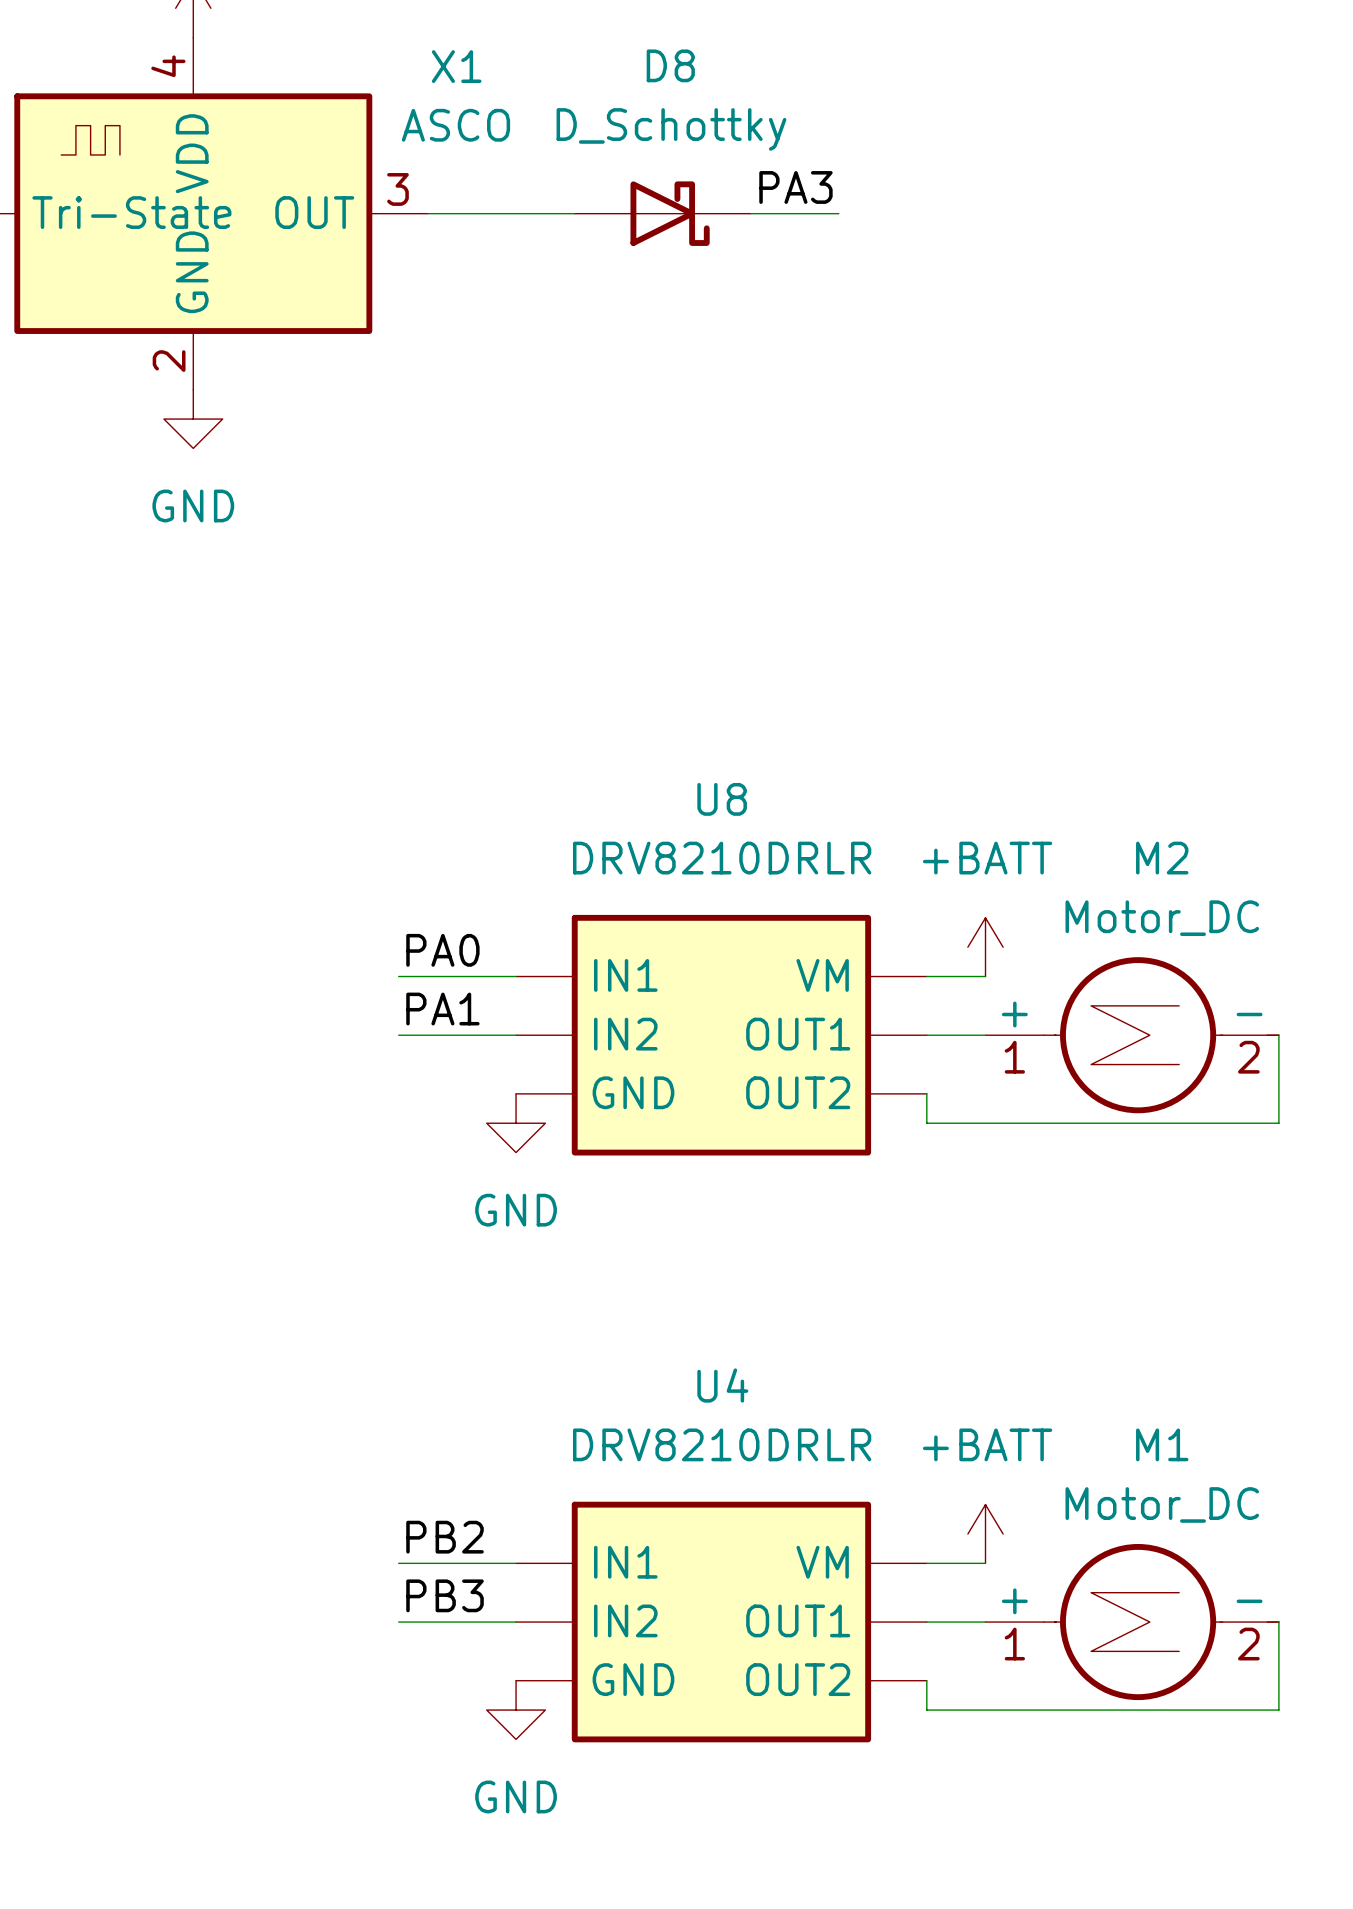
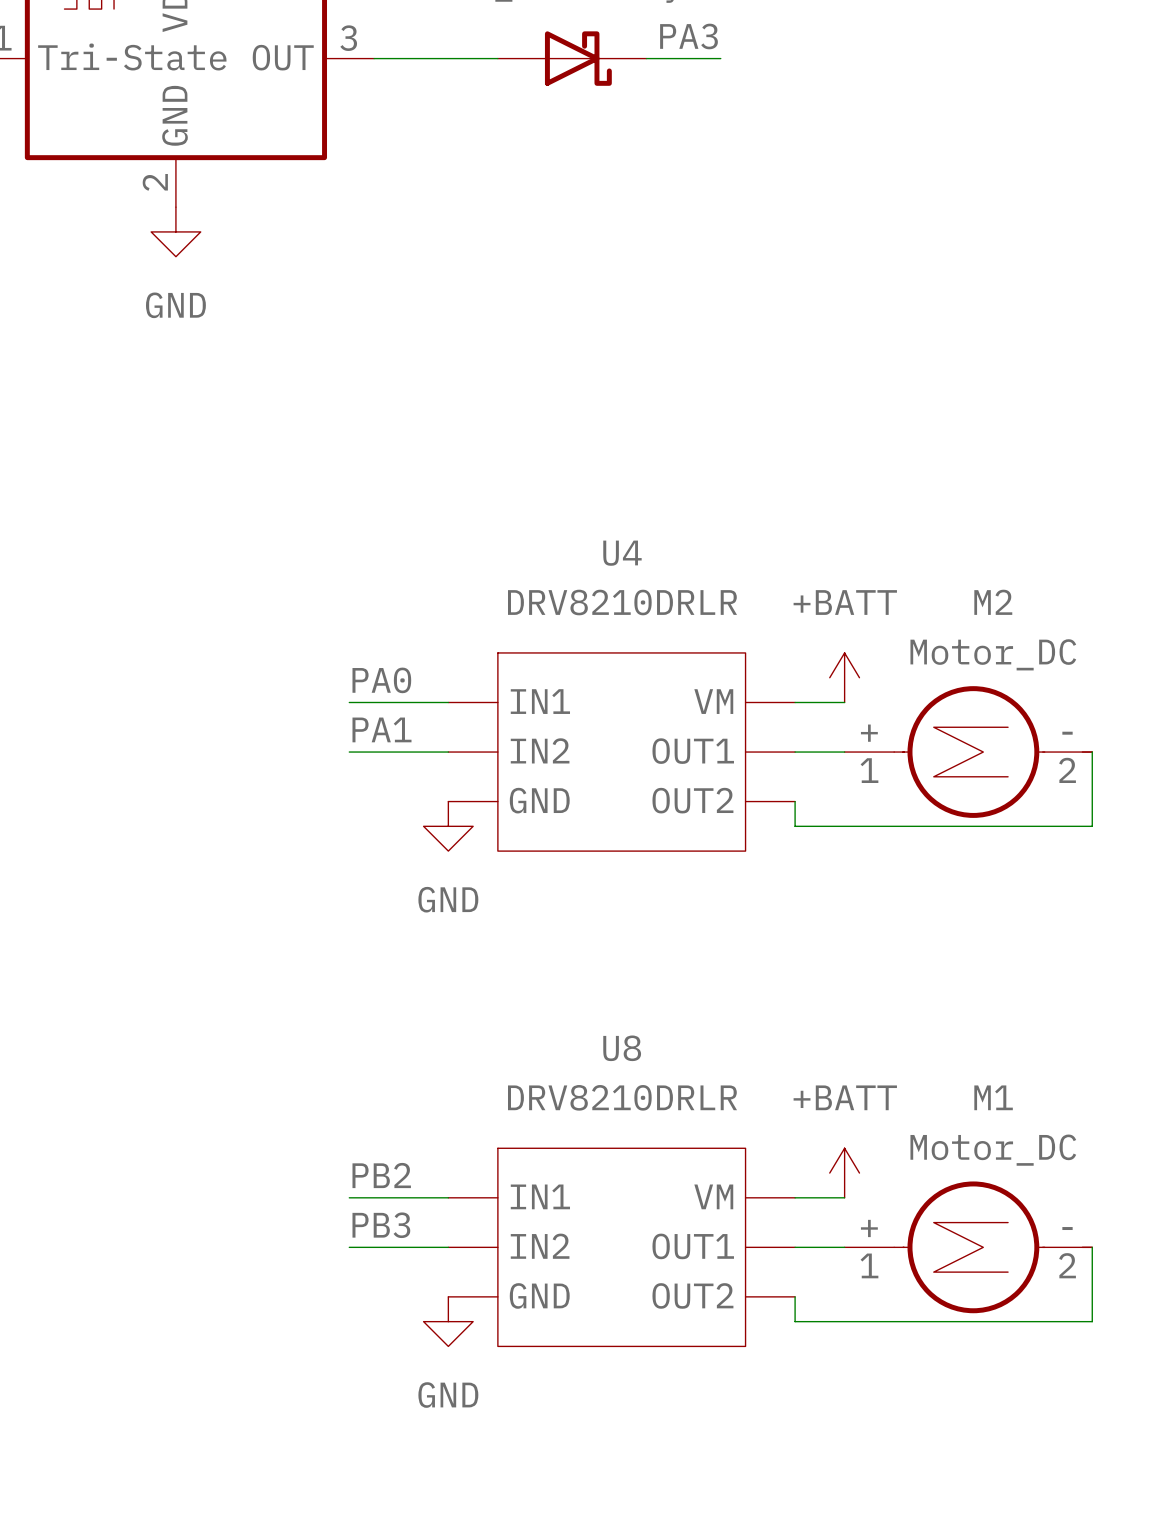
U8 symbol: [516, 914, 927, 1156] -> [448, 1148, 796, 1347]
U4 symbol: [516, 1501, 927, 1743] -> [448, 652, 796, 852]

